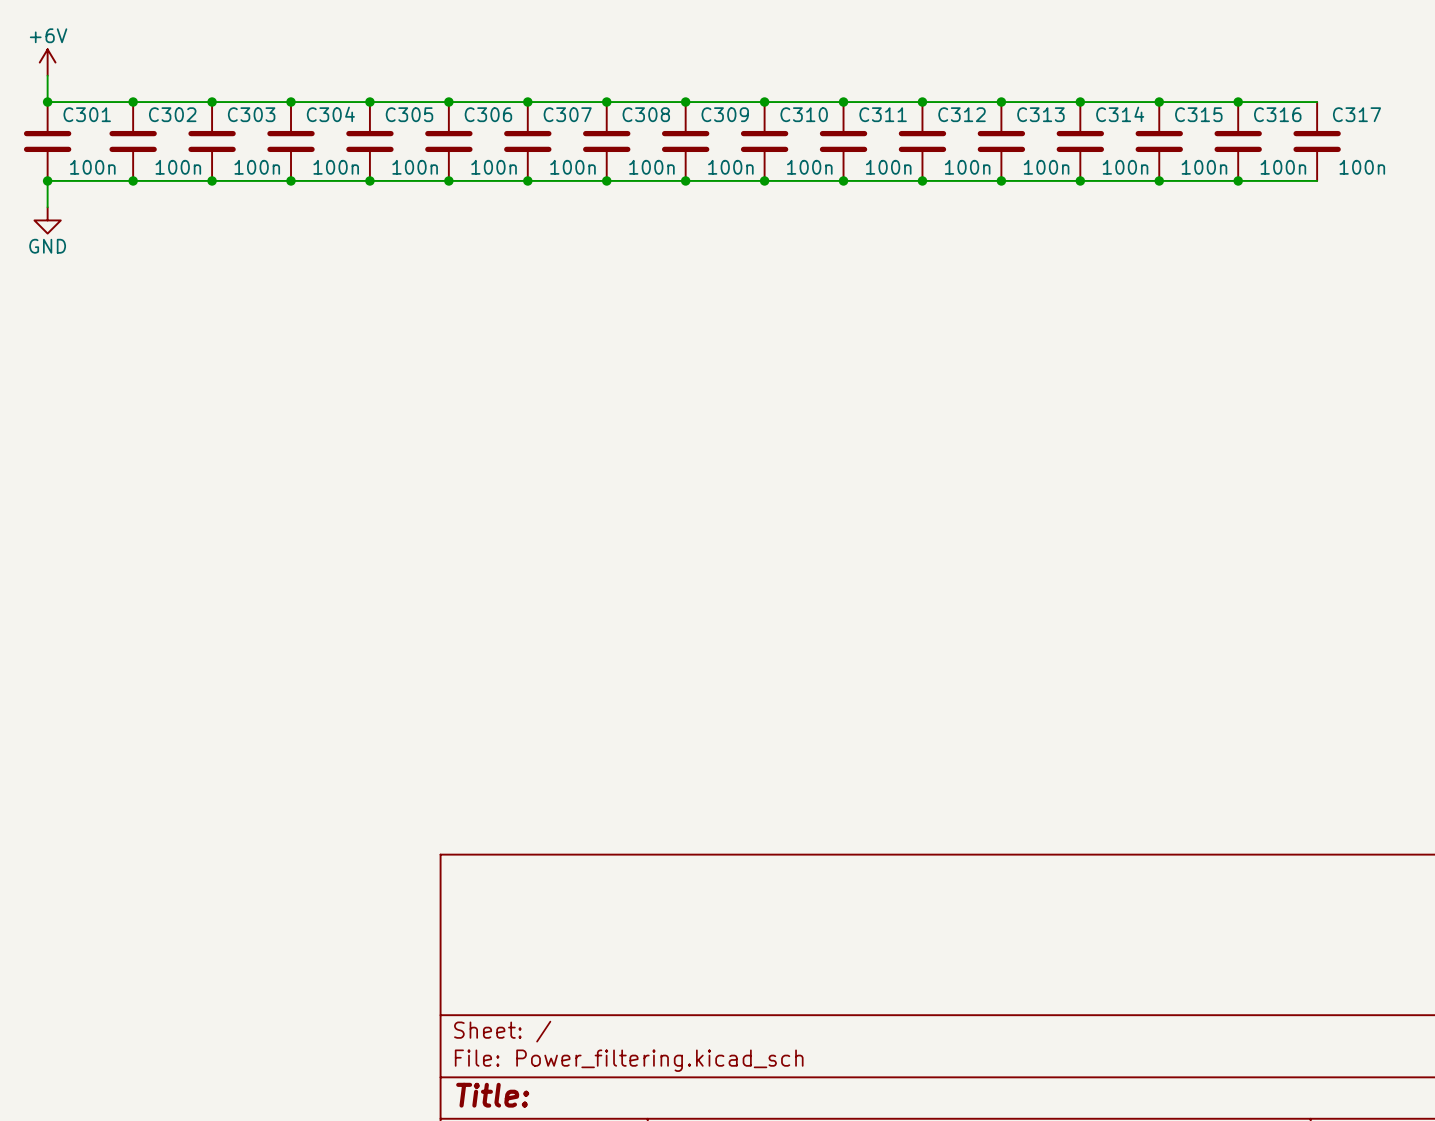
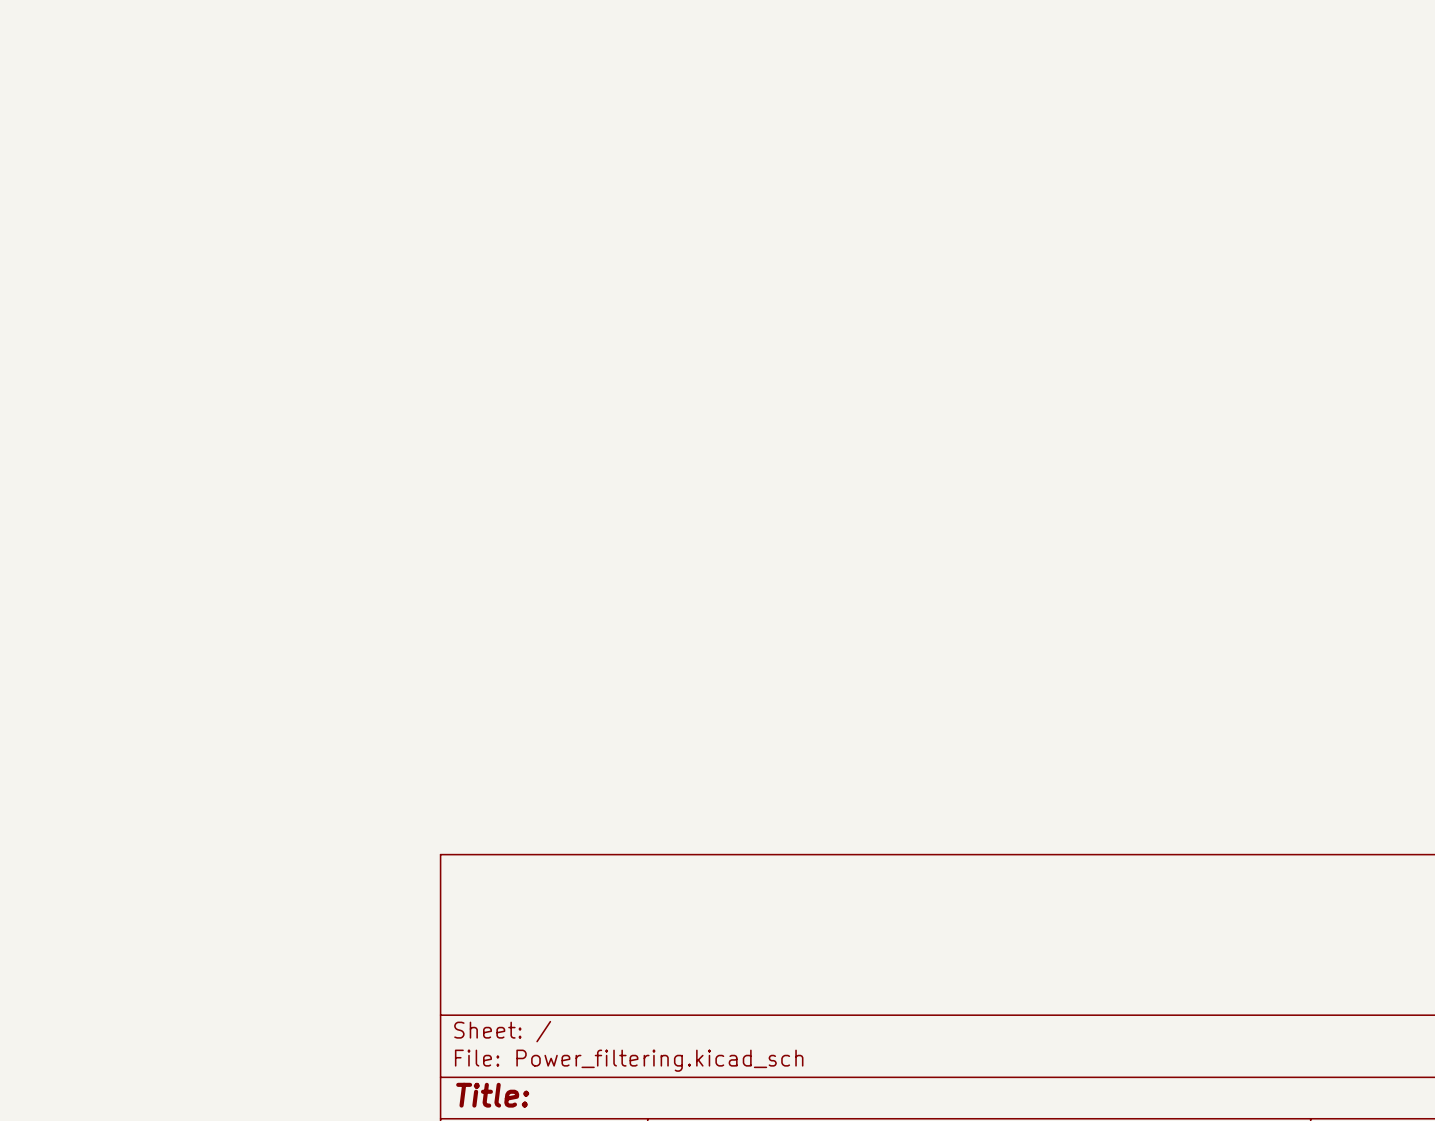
power symbol: +6V (47, 62) -> none
wire: (47, 75) (47, 102) (1317, 102) -> none
junction: (47, 102) -> none
junction: (133, 102) -> none
junction: (212, 102) -> none
junction: (291, 102) -> none
junction: (369, 102) -> none
junction: (448, 102) -> none
junction: (527, 102) -> none
junction: (606, 102) -> none
junction: (685, 102) -> none
junction: (764, 102) -> none
junction: (843, 102) -> none
junction: (922, 102) -> none
junction: (1001, 102) -> none
junction: (1080, 102) -> none
junction: (1159, 102) -> none
junction: (1238, 102) -> none
C301: 100n (47, 141) -> none
C302: 100n (133, 141) -> none
C303: 100n (212, 141) -> none
C304: 100n (291, 141) -> none
C305: 100n (369, 141) -> none
C306: 100n (448, 141) -> none
C307: 100n (527, 141) -> none
C308: 100n (606, 141) -> none
C309: 100n (685, 141) -> none
C310: 100n (764, 141) -> none
C311: 100n (843, 141) -> none
C312: 100n (922, 141) -> none
C313: 100n (1001, 141) -> none
C314: 100n (1080, 141) -> none
C315: 100n (1159, 141) -> none
C316: 100n (1238, 141) -> none
C317: 100n (1317, 141) -> none
junction: (47, 180) -> none
junction: (133, 180) -> none
junction: (212, 180) -> none
junction: (291, 180) -> none
junction: (369, 180) -> none
junction: (448, 180) -> none
junction: (527, 180) -> none
junction: (606, 180) -> none
junction: (685, 180) -> none
junction: (764, 180) -> none
junction: (843, 180) -> none
junction: (922, 180) -> none
junction: (1001, 180) -> none
junction: (1080, 180) -> none
junction: (1159, 180) -> none
junction: (1238, 180) -> none
wire: (1317, 180) (47, 180) (47, 207) -> none
power symbol: GND (47, 220) -> none

